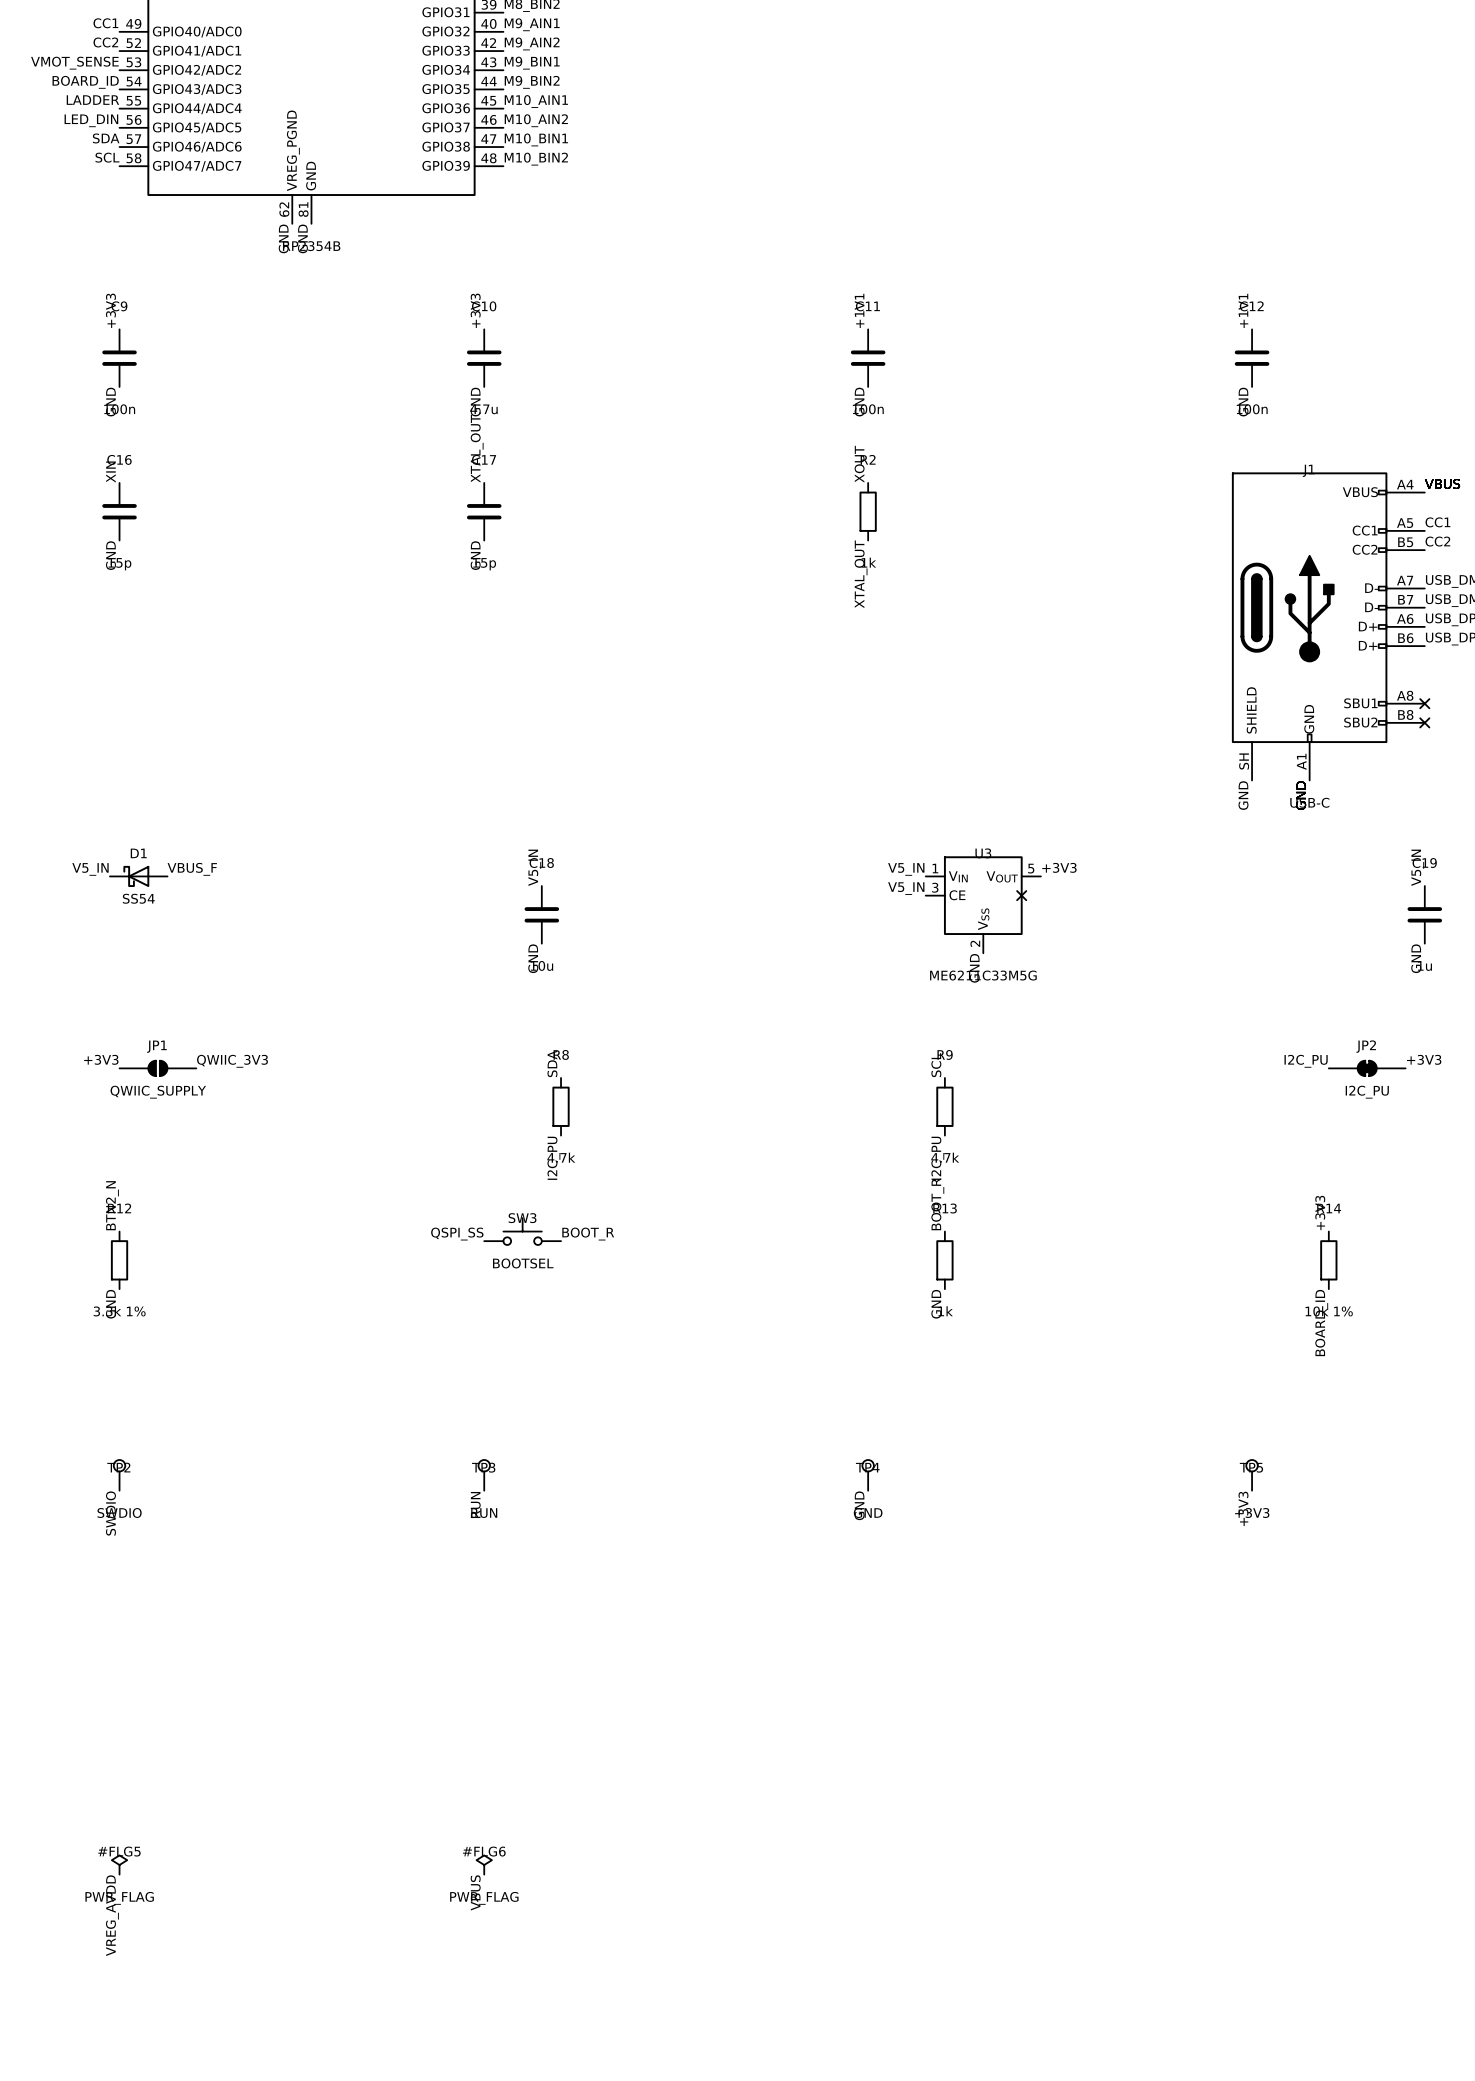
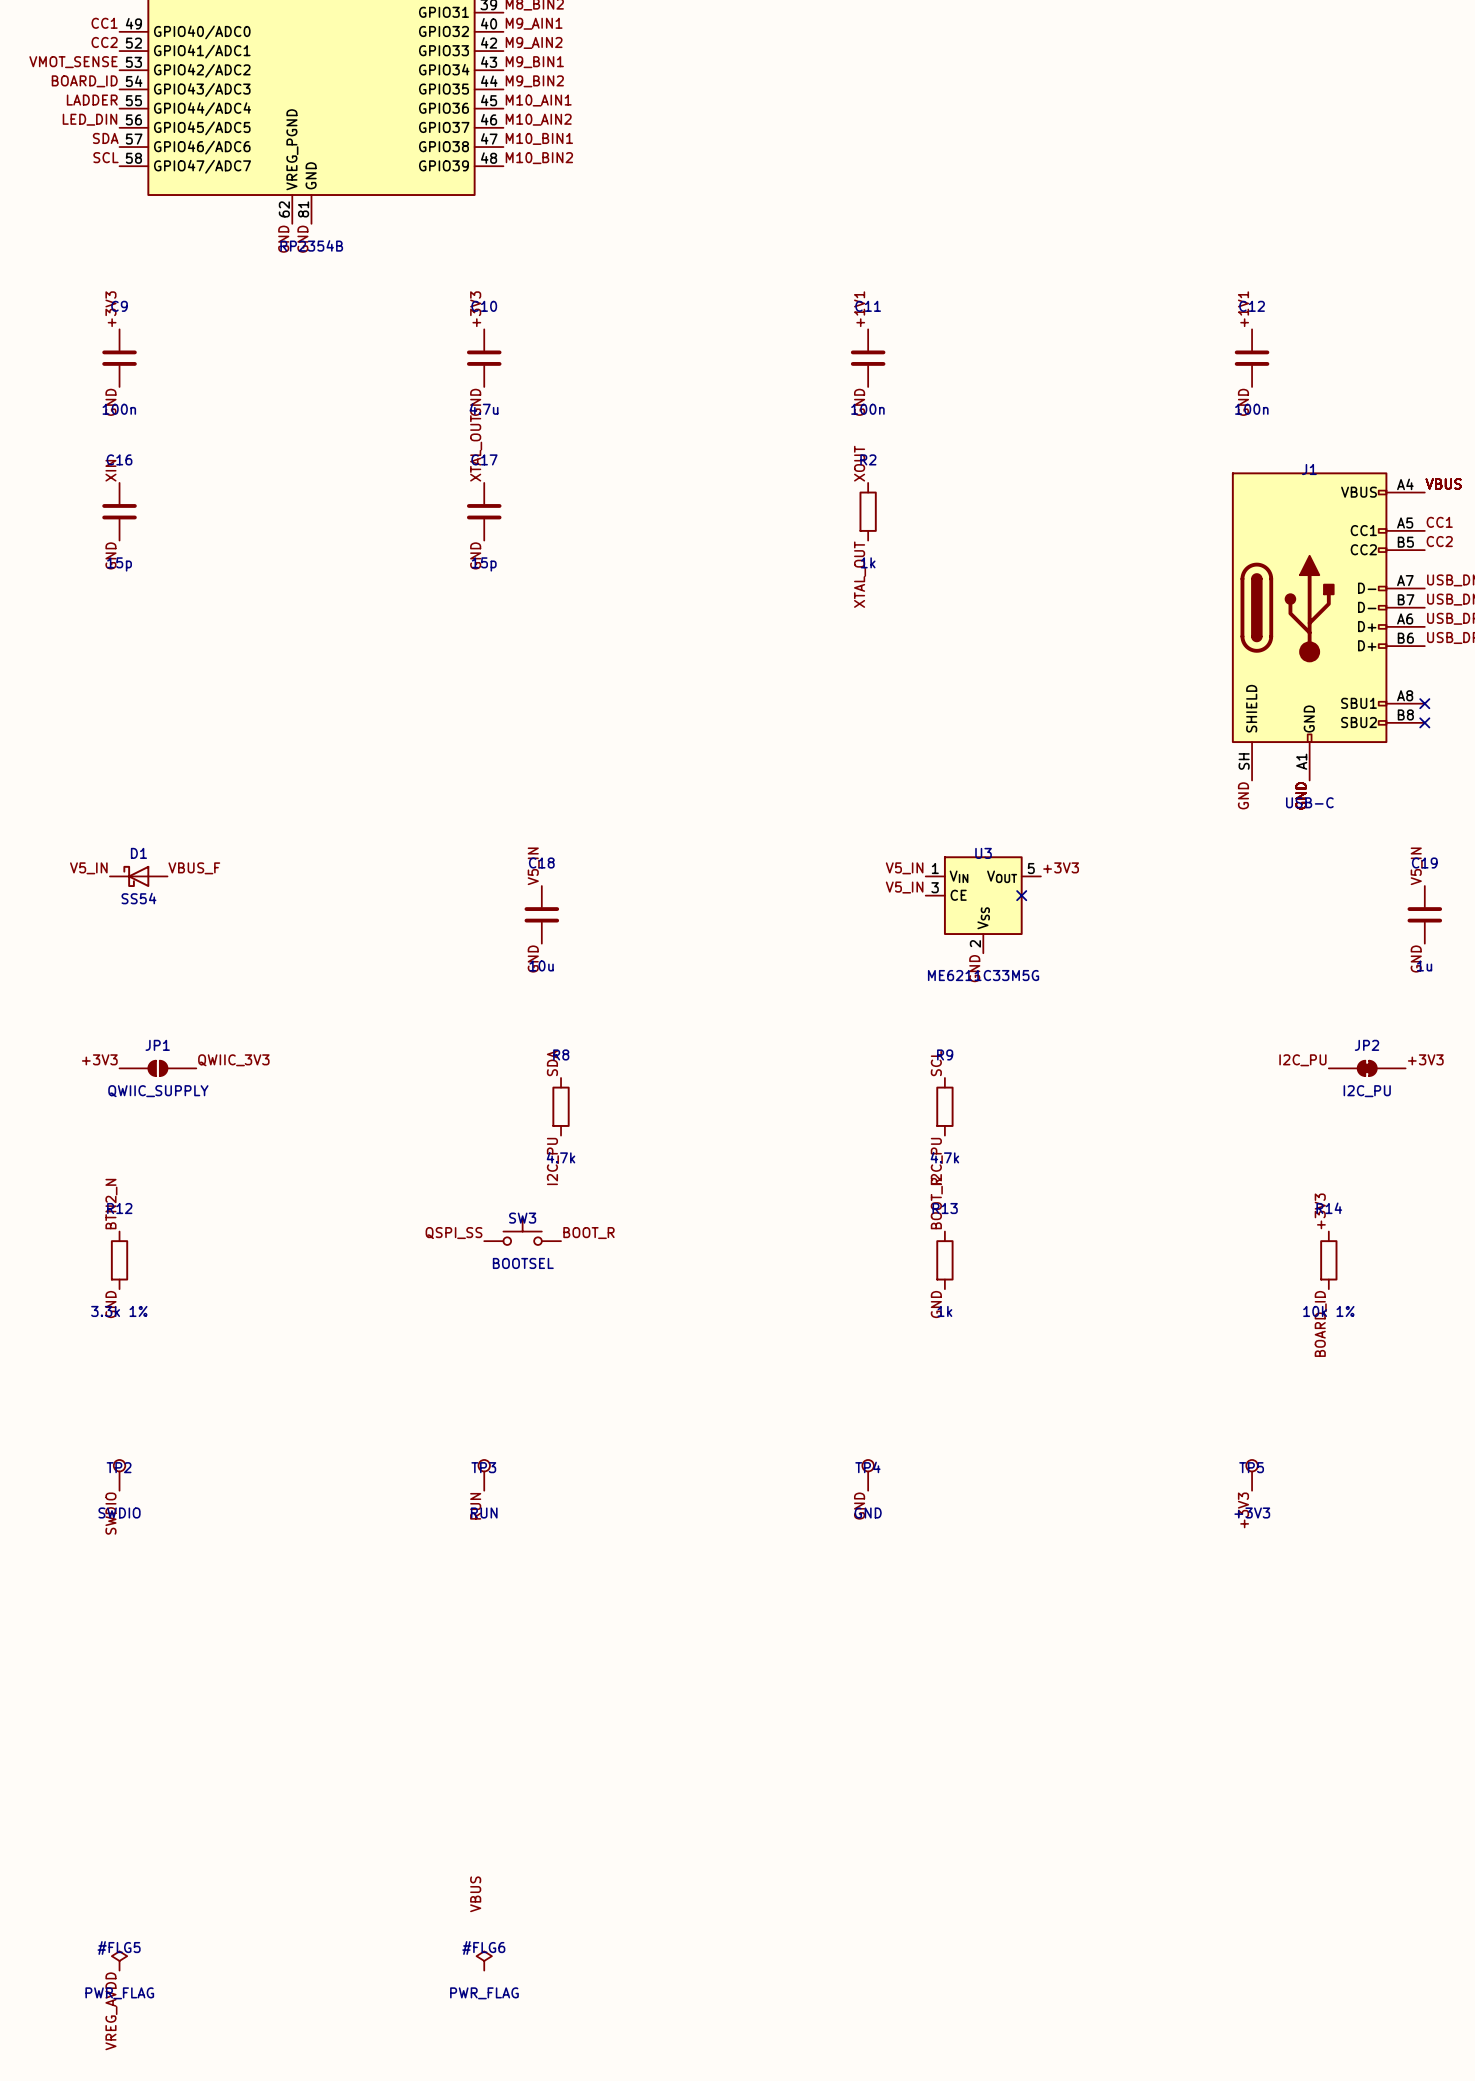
#FLG5 position: PWR_FLAG (119, 1864) -> PWR_FLAG (119, 1960)
#FLG6 position: PWR_FLAG (484, 1864) -> PWR_FLAG (484, 1960)
label position: VREG_AVDD (112, 1915) -> VREG_AVDD (111, 2011)

